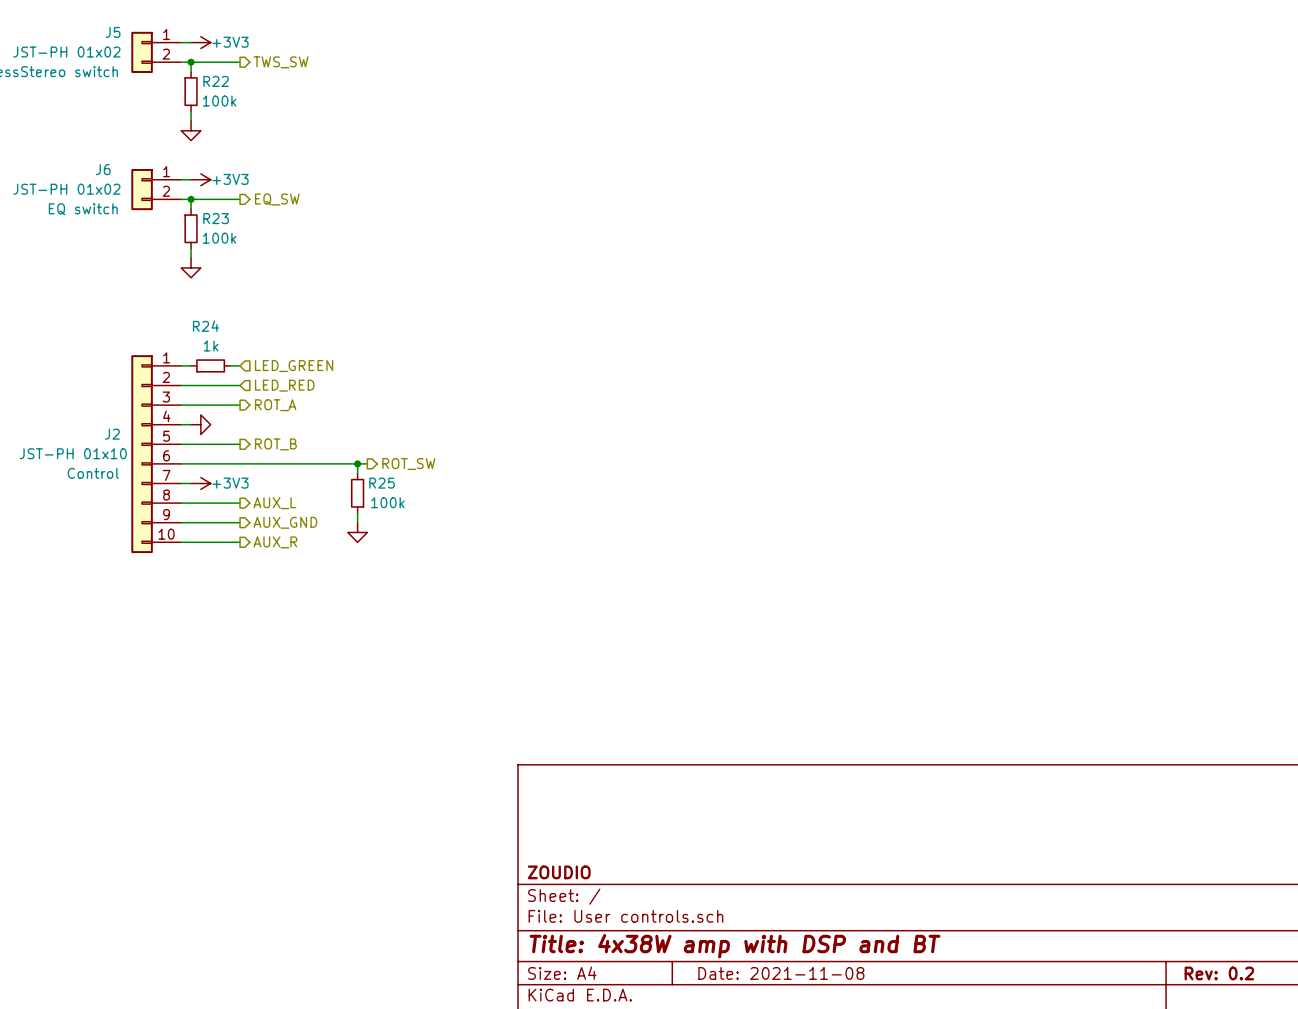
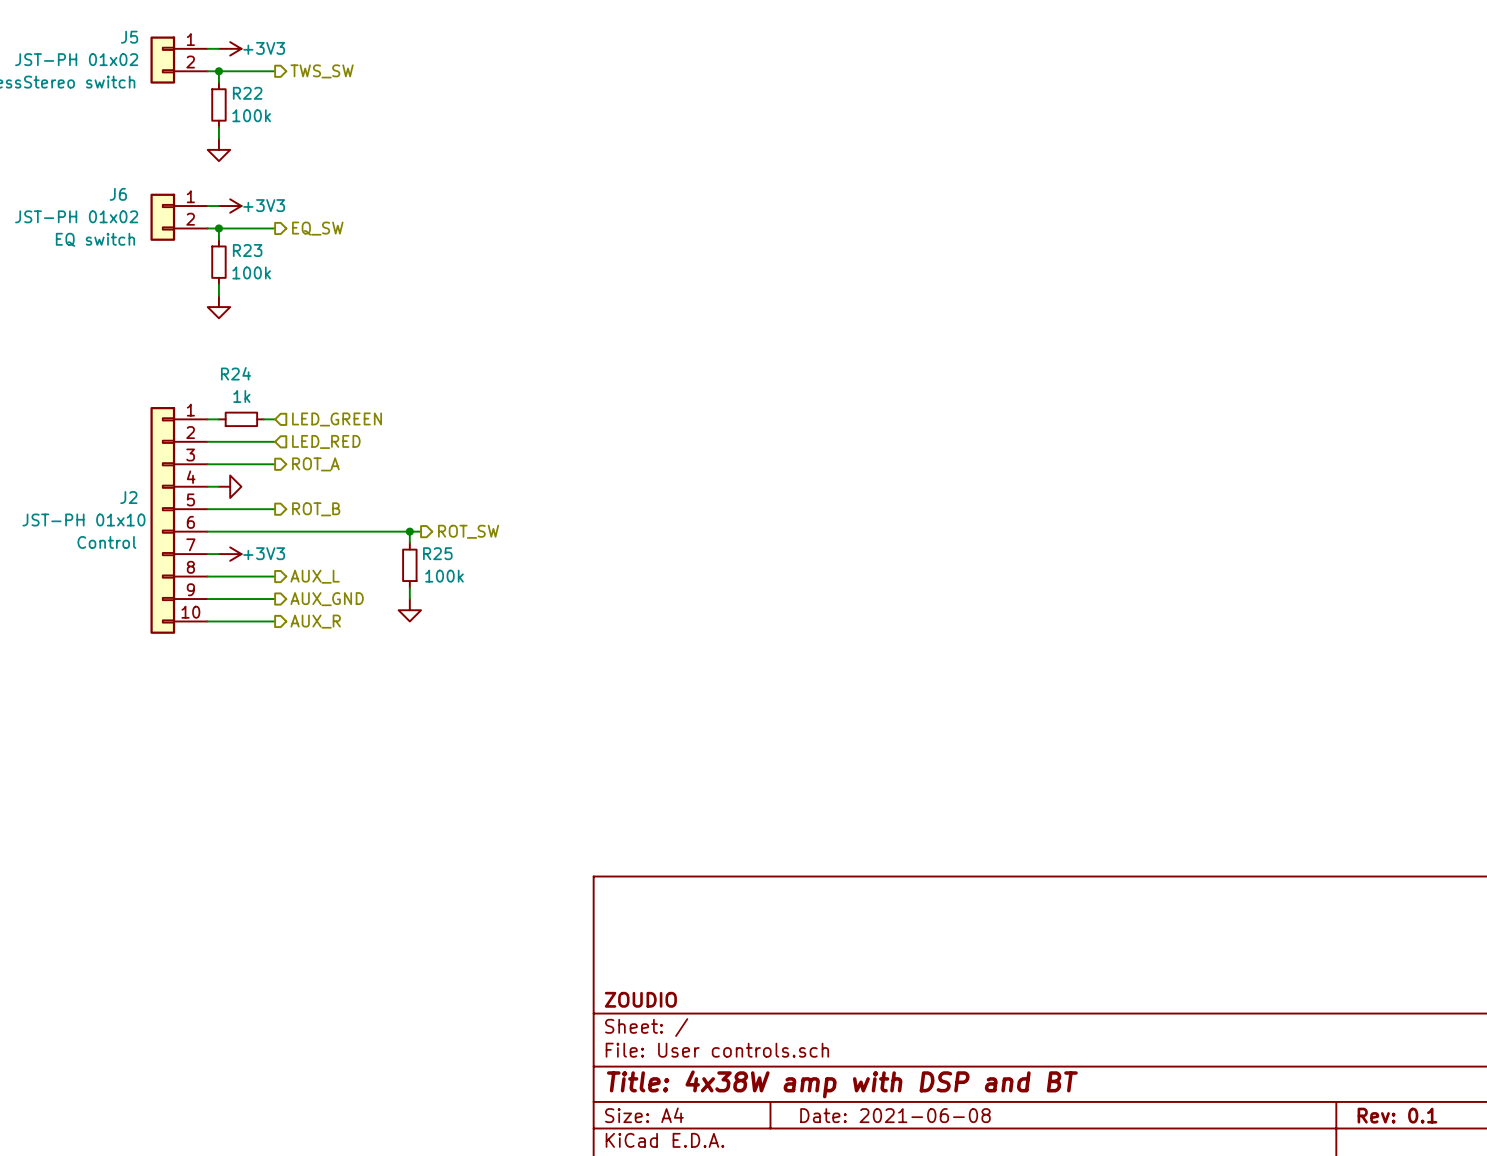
title block: Date: 2021-11-08 (781, 973) -> Date: 2021-06-08 (895, 1115)
title block: Rev: 0.2 (1219, 973) -> Rev: 0.1 (1397, 1115)

